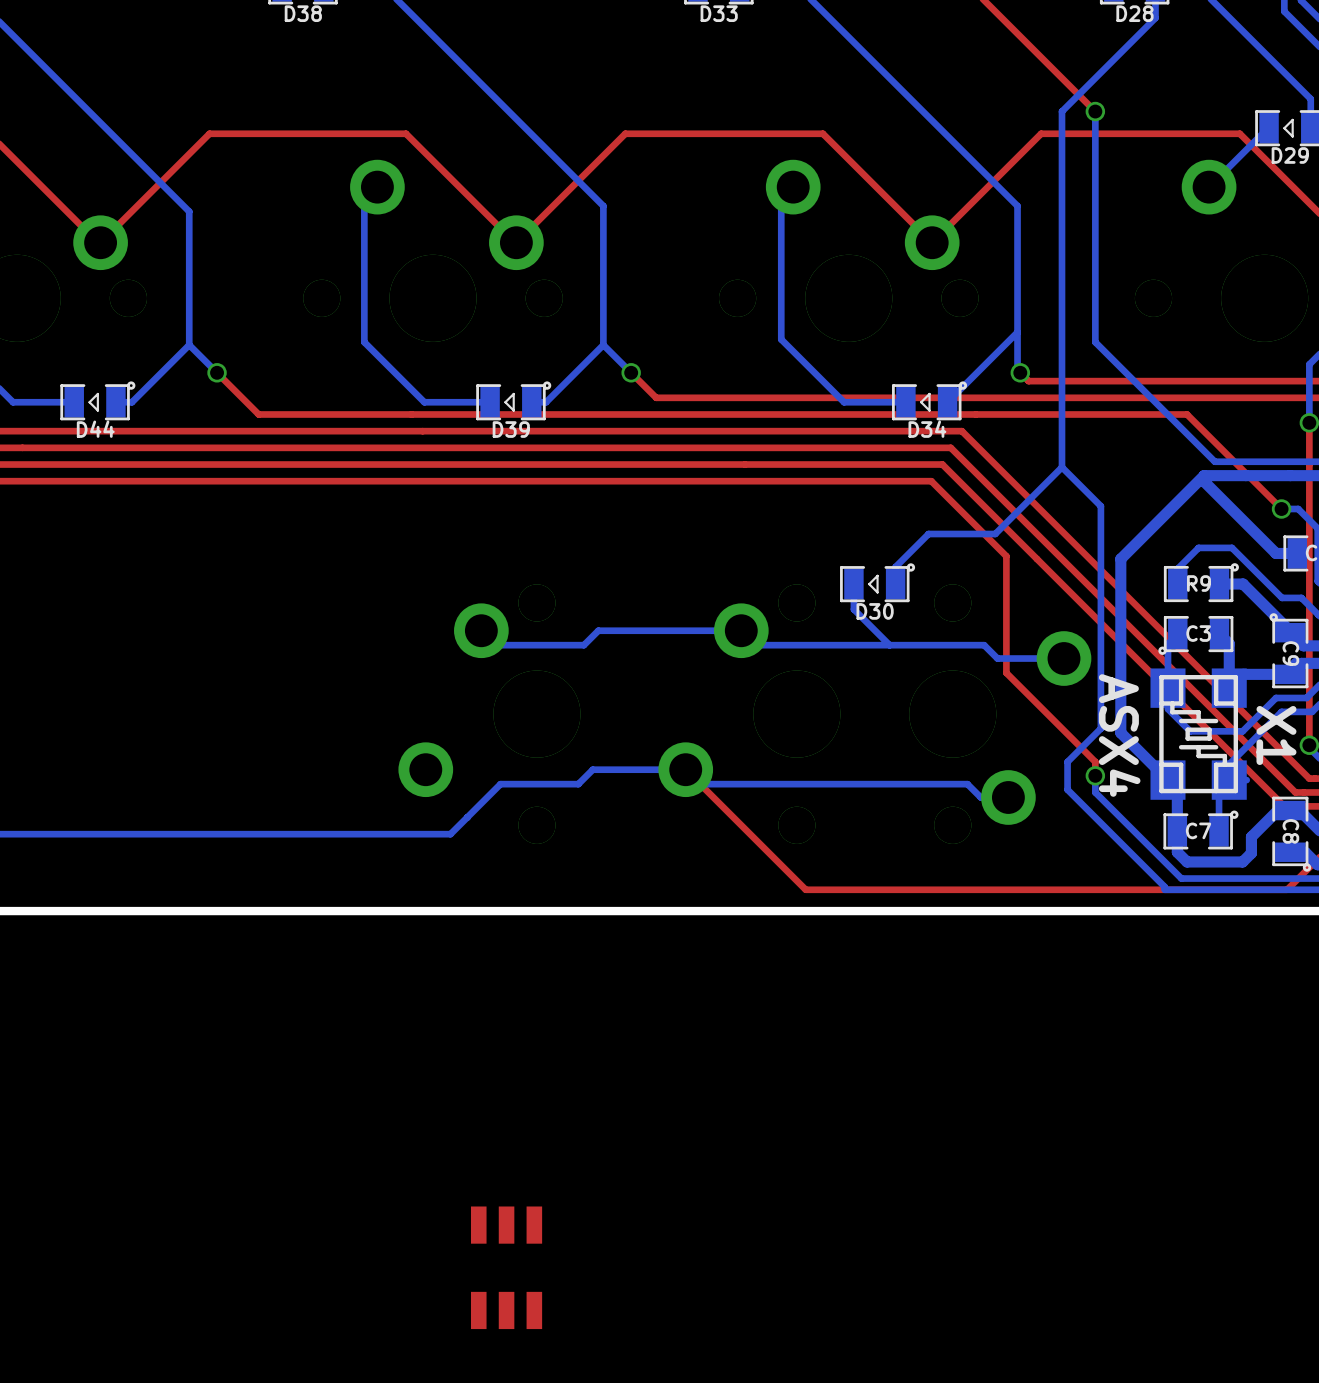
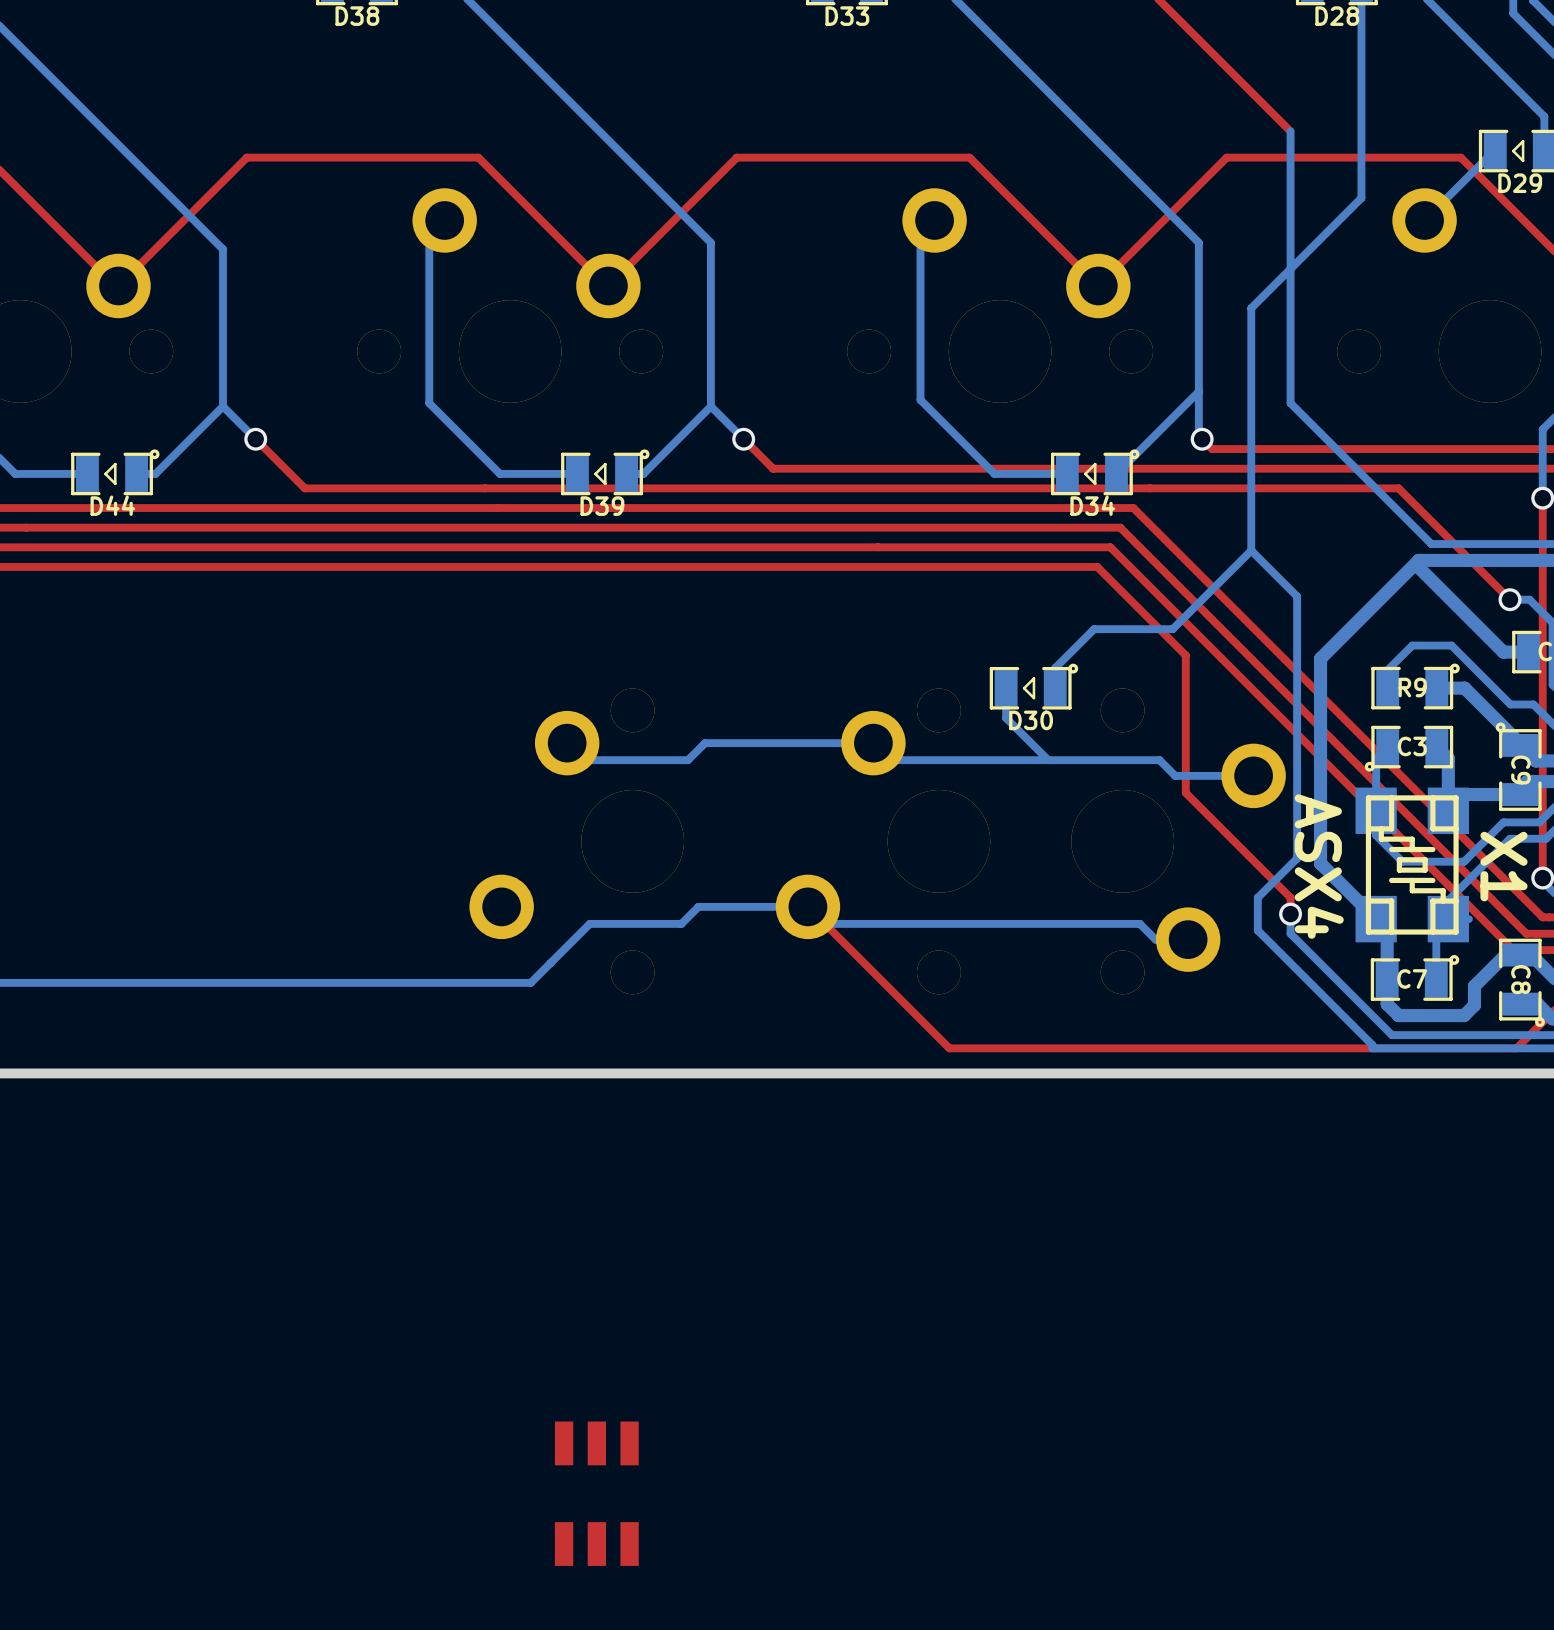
bottom track: (1155, 18) (1061, 111) (1061, 261) -> (1361, 21) (1361, 198) (1251, 308)
via: (1095, 111) -> none

